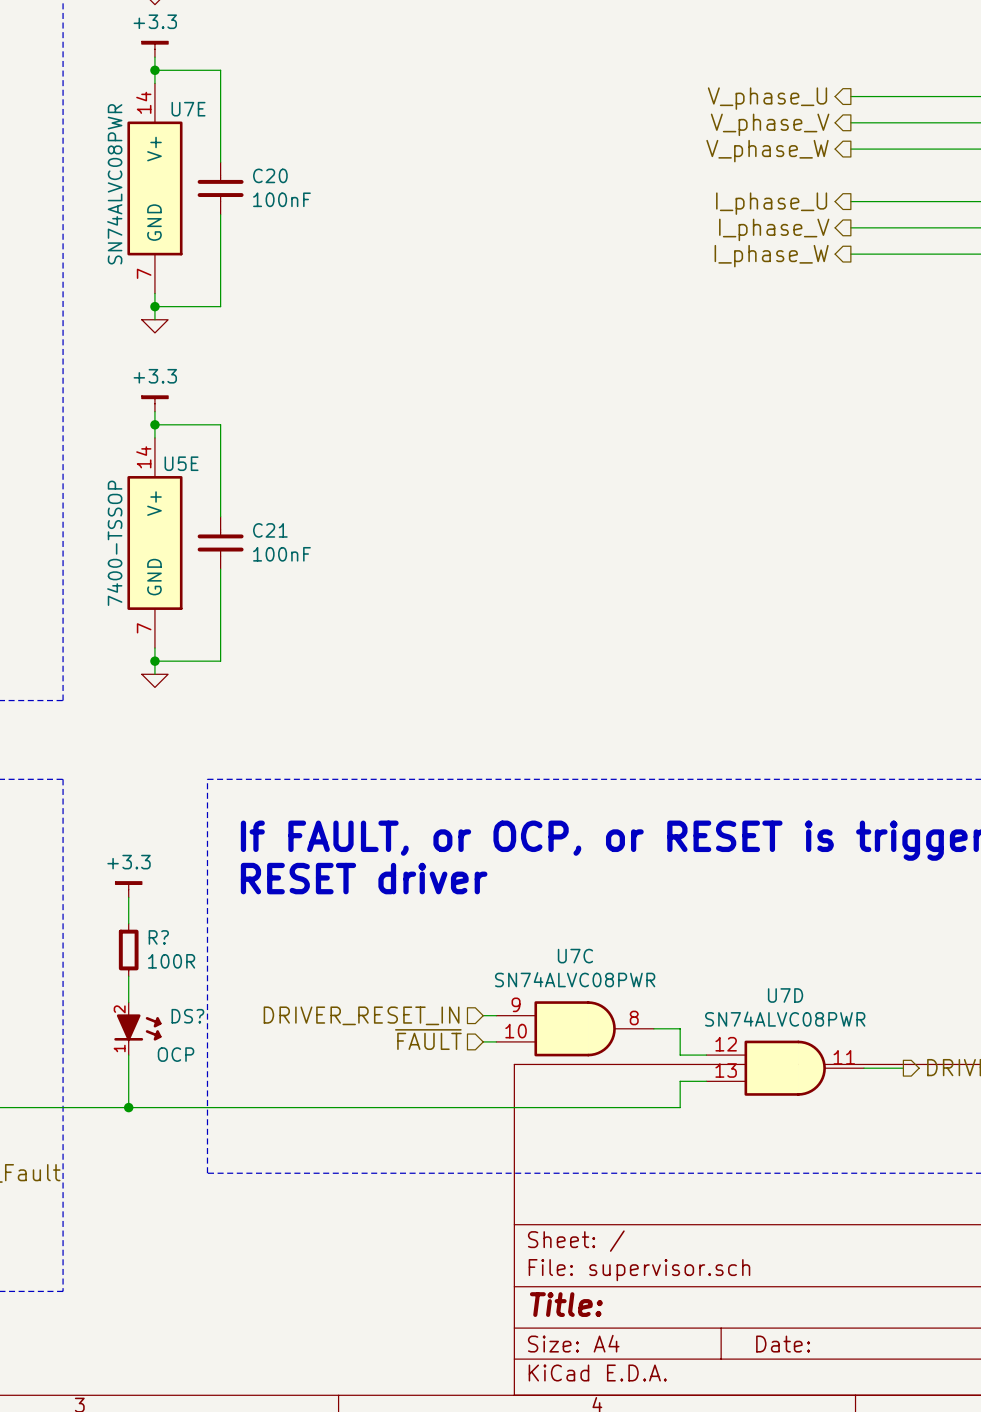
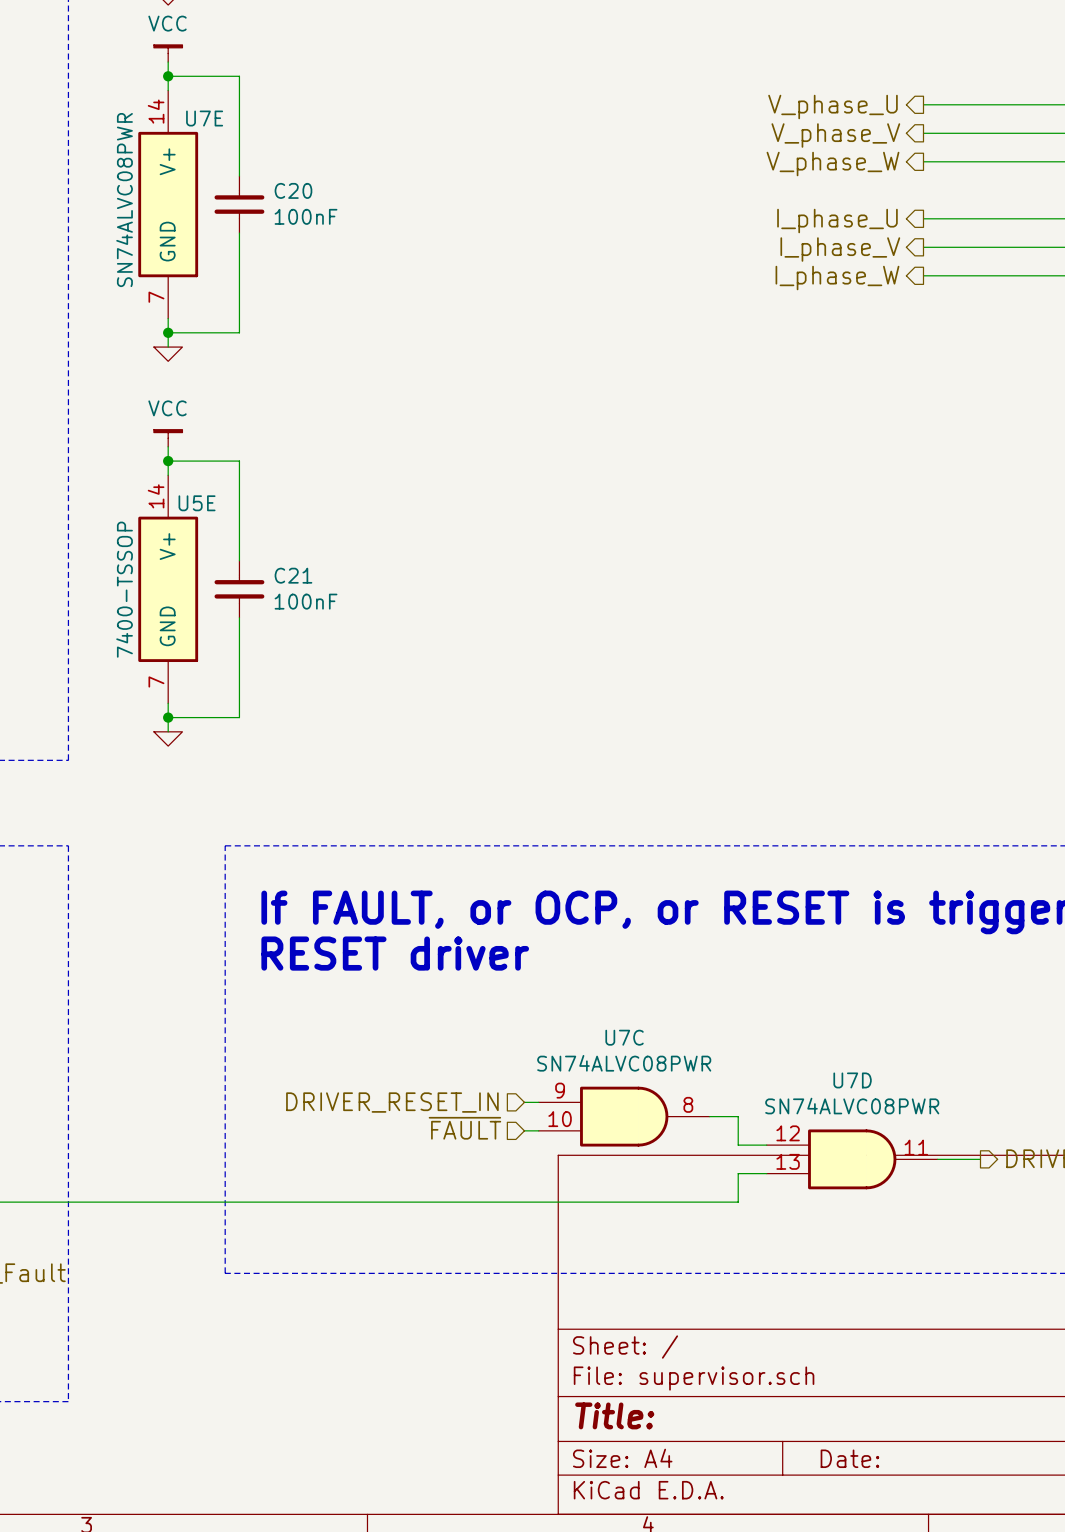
power symbol: +3.3 (154, 49) -> VCC (168, 53)
power symbol: +3.3 (154, 403) -> VCC (168, 438)
power symbol: +3.3 (128, 889) -> none
wire: (128, 897) (128, 923) -> none
R?: 100R (128, 950) -> none
wire: (128, 976) (128, 1002) -> none
DS?: OCP (137, 1028) -> none
wire: (128, 1055) (128, 1107) -> none
junction: (128, 1107) -> none

